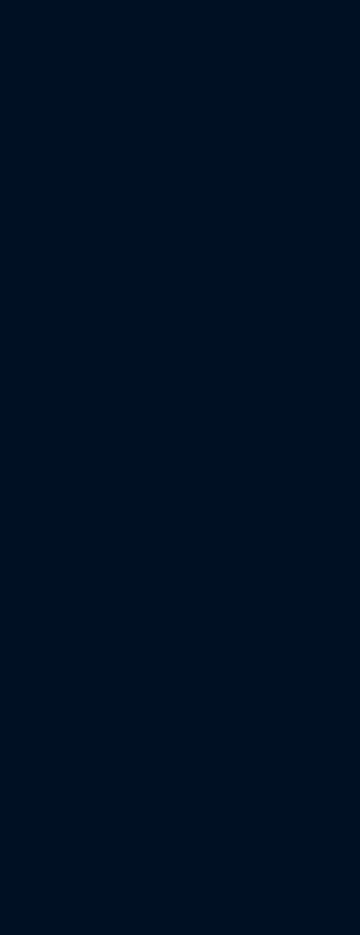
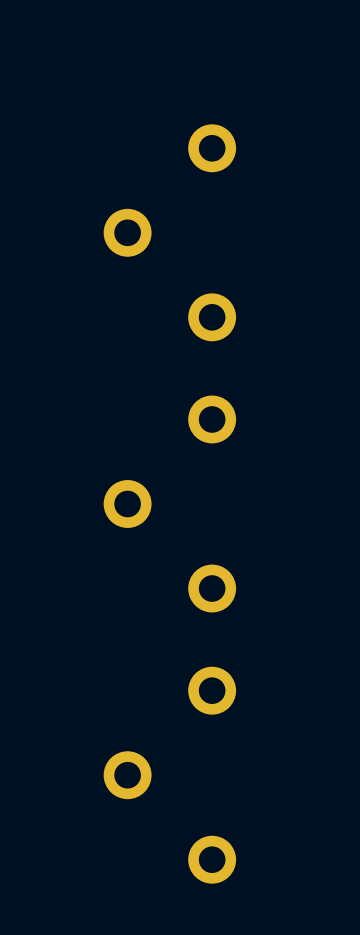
part: none -> (169, 232)
part: none -> (169, 504)
part: none -> (169, 775)

